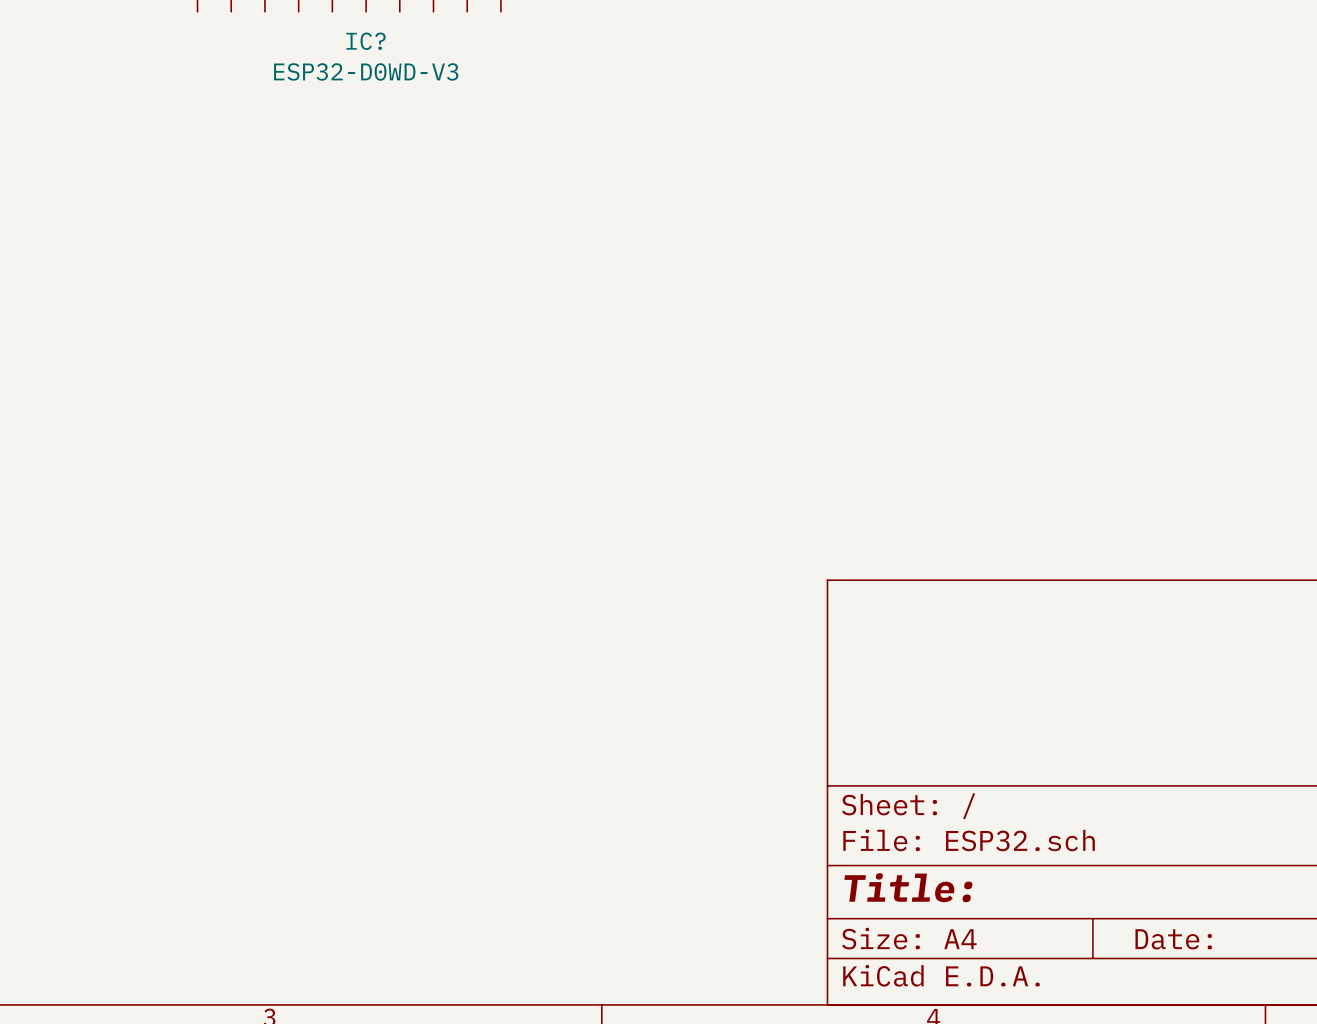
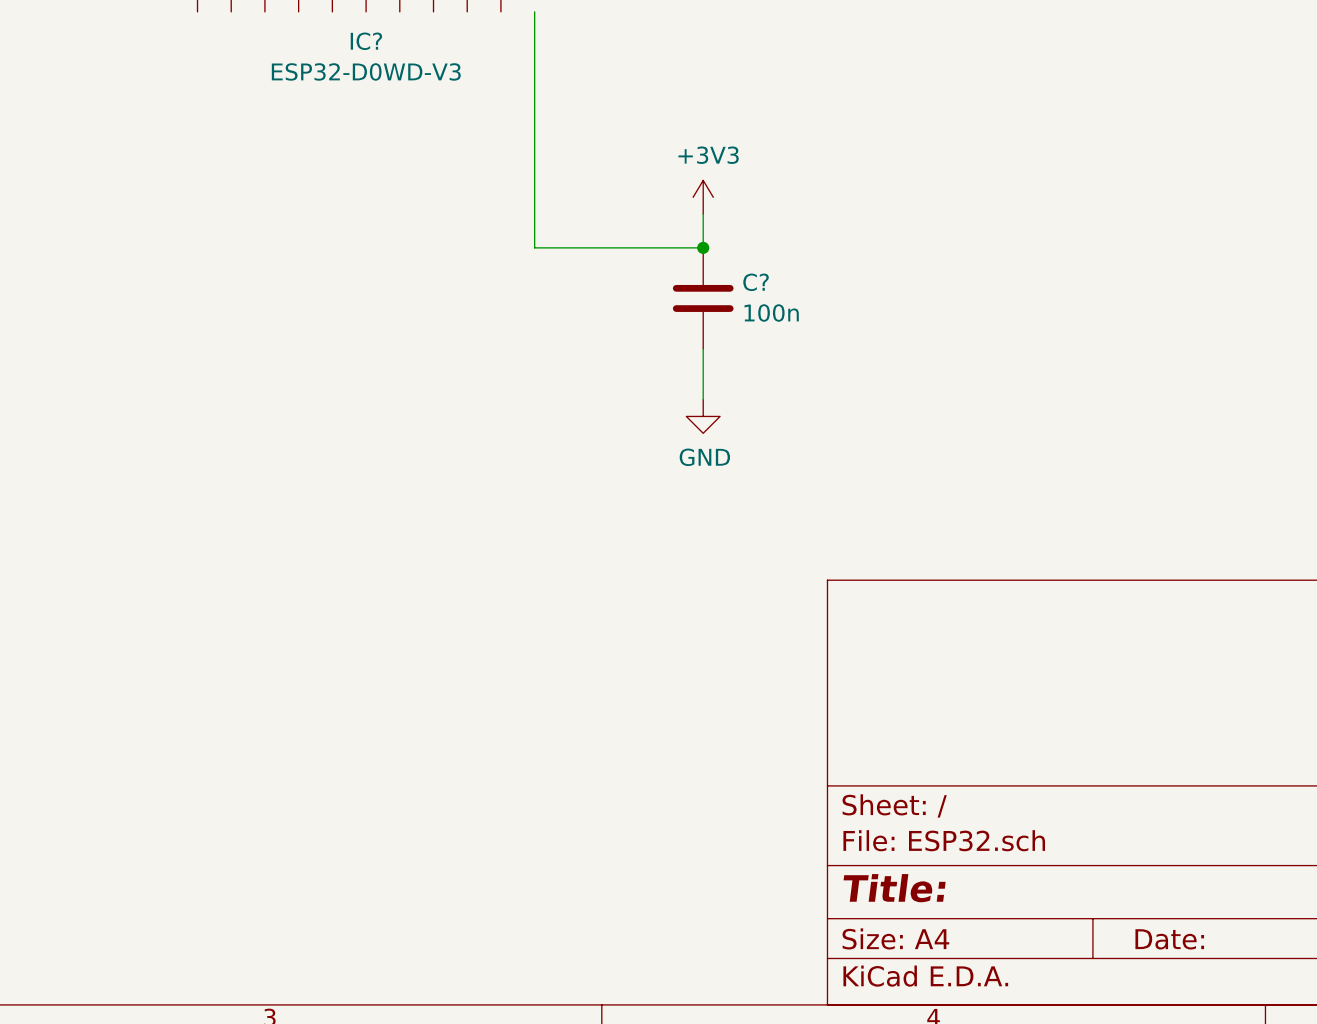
wire: none -> (534, 11) (534, 247) (703, 247) (703, 214)
power symbol: none -> +3V3 (703, 197)
junction: none -> (703, 247)
C?: none -> 100n (703, 298)
wire: none -> (703, 349) (703, 399)
power symbol: none -> GND (703, 416)

